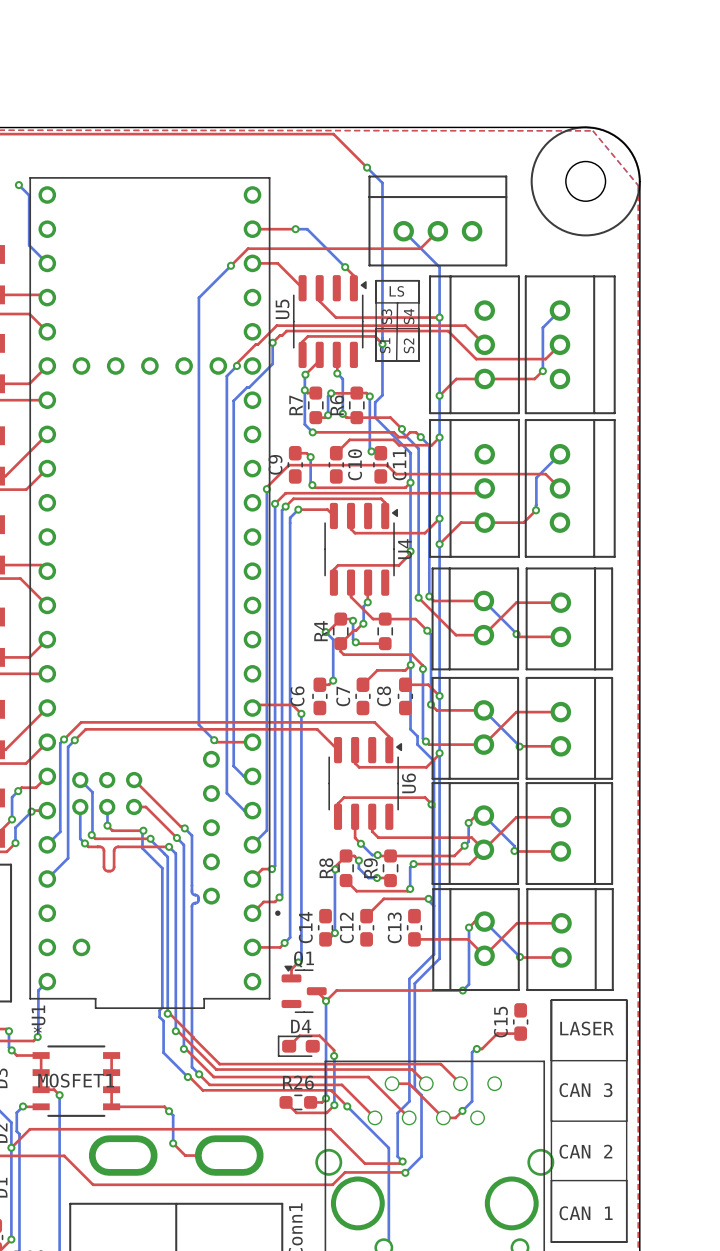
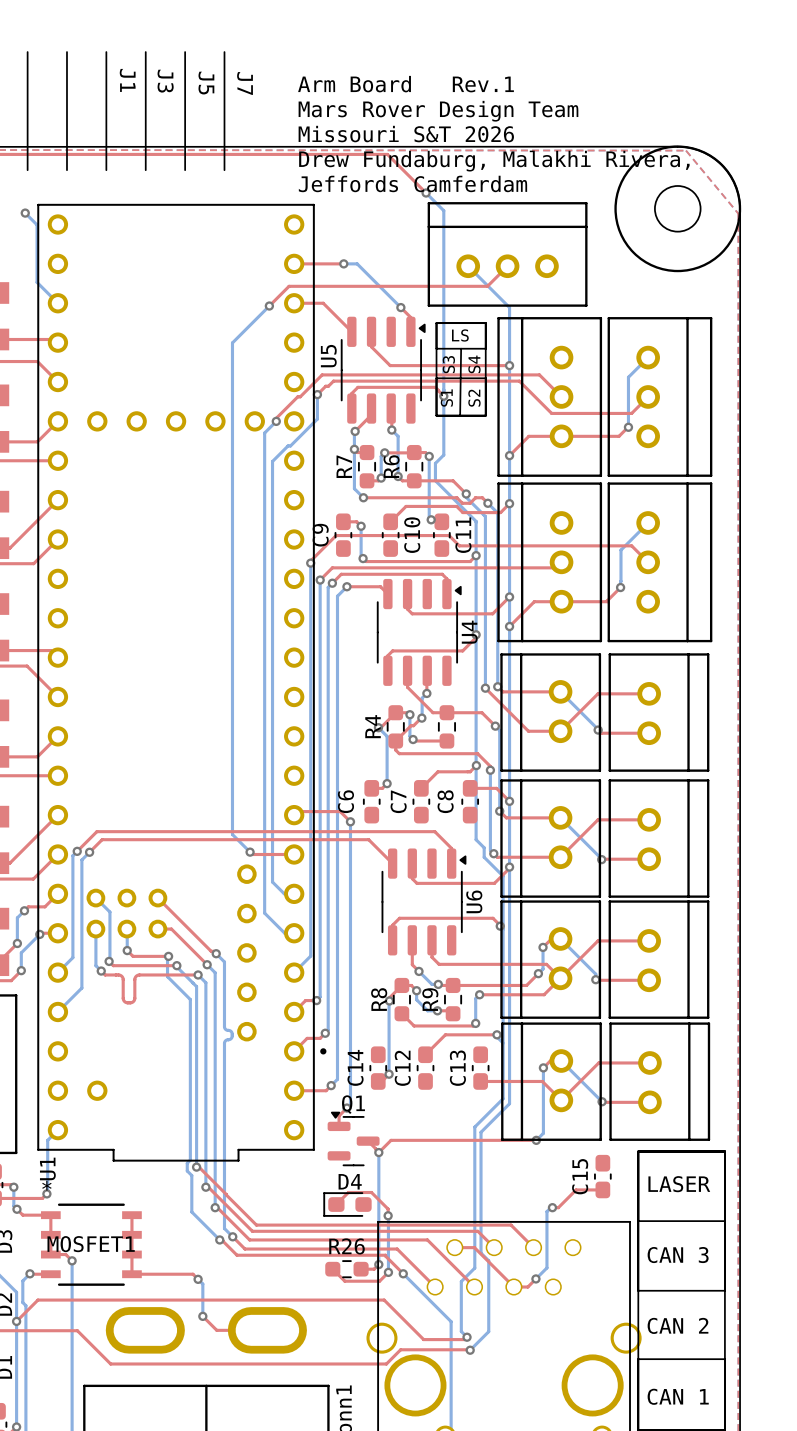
line: none -> (27, 52) (27, 170)
line: none -> (66, 52) (66, 170)
line: none -> (106, 52) (106, 170)
line: none -> (145, 52) (145, 170)
line: none -> (185, 52) (185, 170)
line: none -> (224, 52) (224, 170)
text: none -> J1 (127, 80)
text: none -> J3 (165, 81)
text: none -> J5 (206, 83)
text: none -> J7 (245, 83)
text: none -> Arm Board Rev.1 (406, 84)
text: none -> Mars Rover Design Team (438, 111)
text: none -> Missouri S&T 2026 (406, 134)
text: none -> Drew Fundaburg, Malakhi Rivera, (494, 161)
text: none -> Jeffords Camferdam (412, 183)

